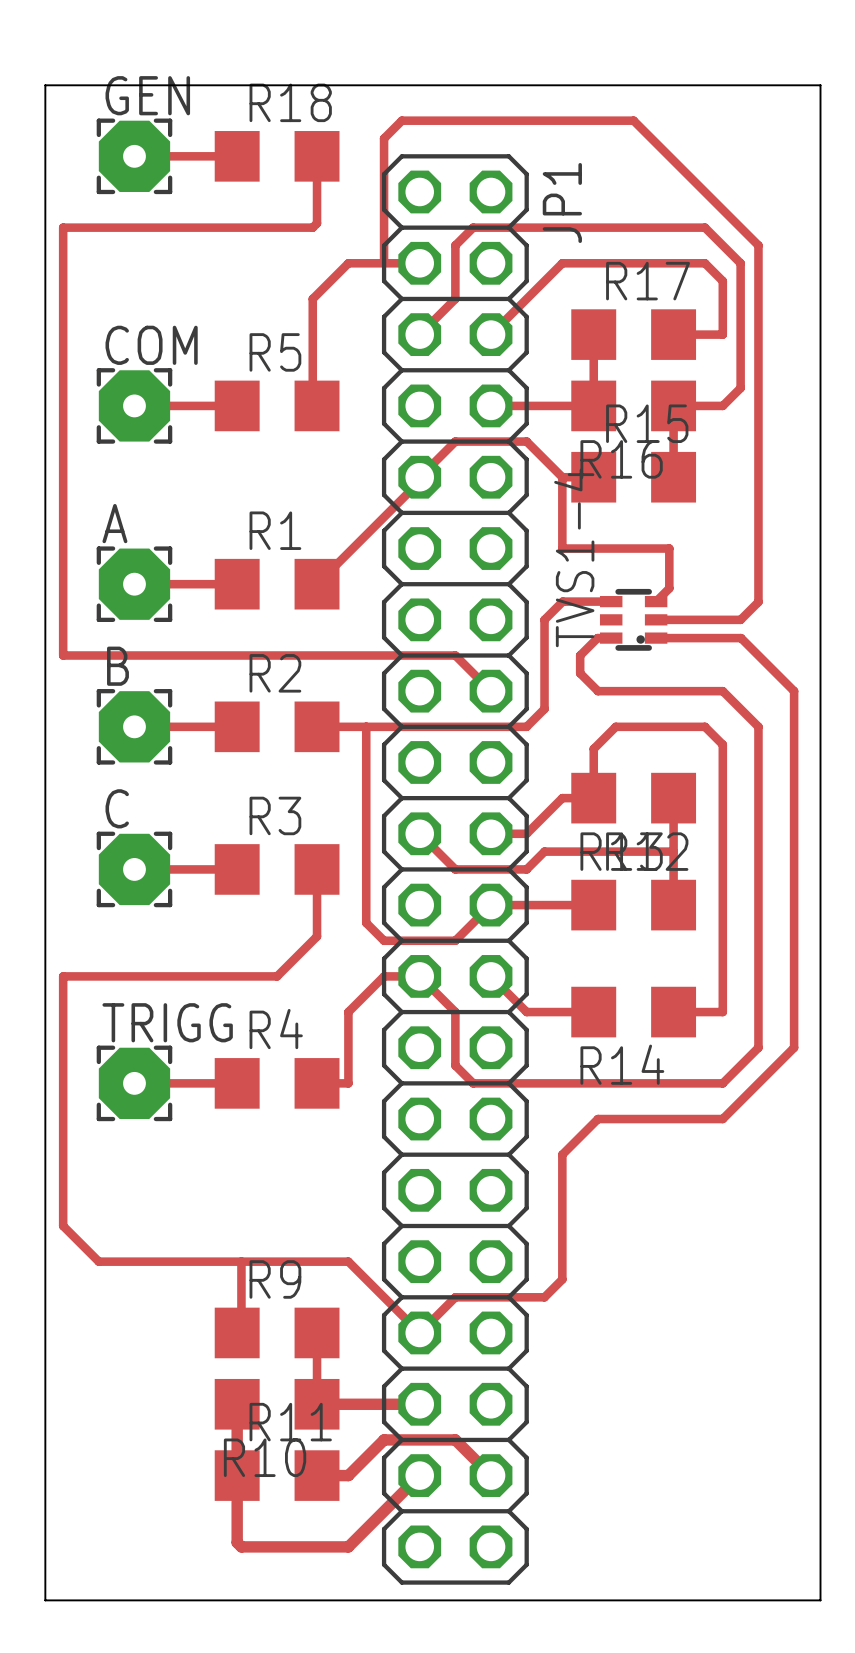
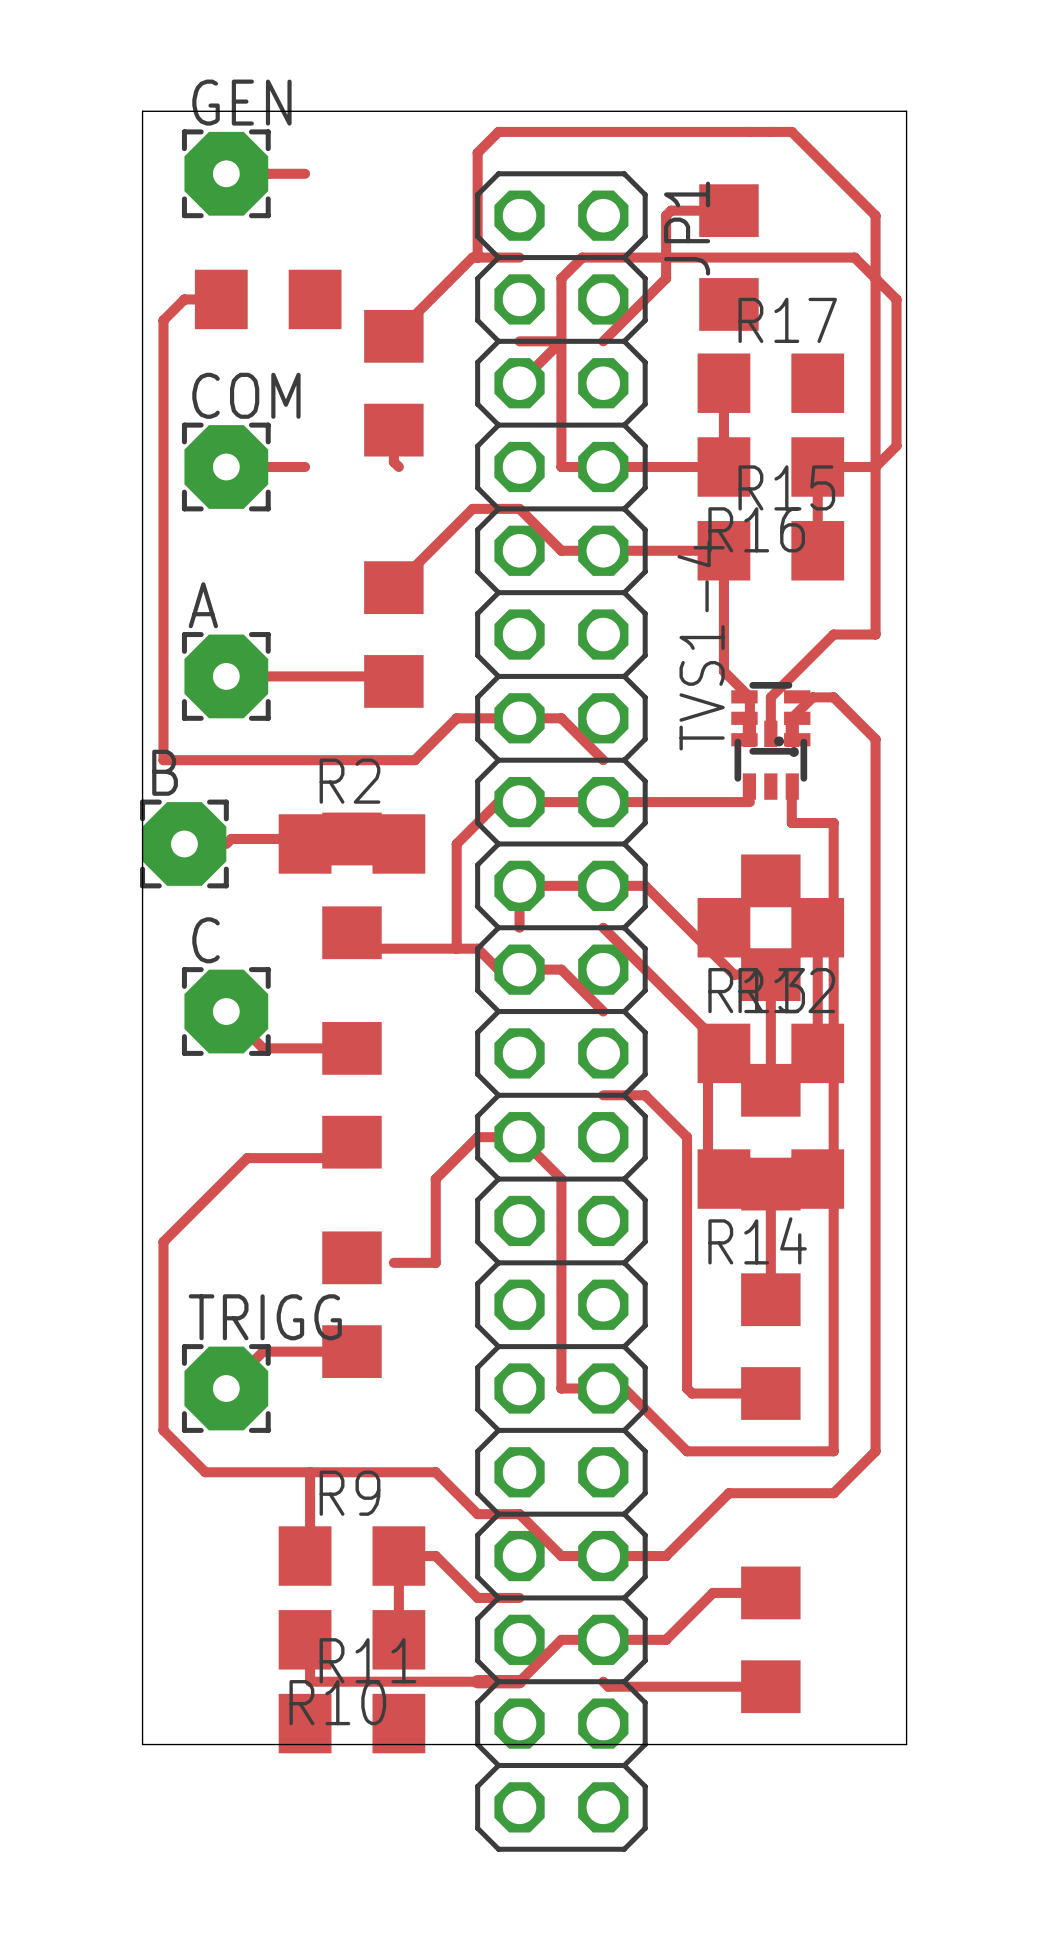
board edge: (45, 85) (820, 85) (820, 1600) (45, 1600) (45, 85) -> (142, 111) (142, 1744) (906, 1744) (906, 111) (142, 111)
top track: (633, 120) (758, 245) (758, 602) (740, 619) (656, 619) -> none
GEN position: (134, 156) -> (226, 173)
R18: (277, 156) -> none
top track: (317, 156) (317, 223) (312, 227) (63, 227) (63, 655) (116, 655) -> (221, 299) (184, 299) (163, 320) (163, 760)
top track: none -> (728, 210) (671, 210) (666, 215) (666, 278) (603, 341)
top track: (384, 227) (384, 263) -> none
top track: none -> (519, 257) (472, 257) (393, 336)
part: none -> (728, 257)
part: none -> (268, 299)
top track: (419, 263) (348, 263) (312, 298) (312, 374) -> none
top track: (722, 281) (704, 263) (562, 263) (491, 334) -> (875, 320) (875, 215) (791, 131) (770, 131)
top track: none -> (519, 341) (561, 341) (561, 466) (603, 466)
part: none -> (393, 383)
top track: (673, 334) (722, 334) -> (770, 733) (770, 697) (833, 634) (875, 634) (875, 383)
COM position: (134, 405) -> (226, 466)
R5: (277, 405) -> none
top track: none -> (687, 550) (561, 550) (519, 508) (472, 508) (393, 587)
top track: none -> (723, 550) (723, 671) (749, 697) (749, 733)
part: none -> (393, 634)
A position: (134, 584) -> (226, 676)
top track: none -> (305, 676) (388, 676) (393, 681)
R1: (277, 584) -> none
top track: (317, 584) (419, 481) (419, 477) (455, 441) (526, 441) (562, 477) (562, 548) (669, 548) (669, 588) (656, 601) -> none
top track: (611, 601) (562, 601) (544, 619) (544, 708) (526, 726) (317, 726) -> none
top track: (656, 637) (741, 638) (794, 691) (794, 1047) (722, 1119) (598, 1119) (562, 1154) -> (603, 1095) (645, 1095) (687, 1137) (687, 1346)
top track: (611, 638) (597, 638) (580, 655) (580, 673) (598, 691) -> (456, 843) (498, 802) (728, 802)
top track: (330, 655) (455, 655) (491, 691) -> (414, 760) (456, 718) (561, 718) (603, 760)
part: none -> (770, 760)
top track: (615, 691) (722, 691) (758, 726) (758, 1047) (722, 1083) (473, 1083) (455, 1065) -> (792, 786) (791, 823) (833, 823) (833, 1451) (687, 1451) (624, 1388) (561, 1388) (561, 1241)
top track: none -> (351, 838) (231, 838) (226, 843)
top track: (134, 726) (237, 726) -> none
top track: (722, 744) (704, 726) (615, 726) (593, 748) (593, 798) (562, 798) (526, 833) (491, 833) -> (875, 864) (875, 739) (833, 697) (812, 697) (792, 717) (792, 733)
part: none -> (351, 885)
top track: none -> (519, 927) (519, 906) (540, 885) (645, 885) (733, 974) (770, 974) (770, 1090)
top track: none -> (603, 927) (708, 1032) (708, 1158) (728, 1179) (765, 1179) (770, 1184) (770, 1299)
part: none -> (770, 927)
top track: none -> (351, 932) (367, 948) (477, 948) (498, 969) (561, 969) (603, 1011)
top track: (366, 815) (366, 922) (384, 940) (455, 940) (491, 905) (593, 905) -> none
top track: (419, 833) (455, 869) (526, 869) (544, 851) (673, 851) -> none
top track: (134, 869) (237, 869) -> none
C position: (134, 869) -> (226, 1011)
top track: none -> (226, 1011) (263, 1048) (351, 1048)
R3: (277, 869) -> none
top track: (317, 869) (317, 936) (277, 976) (63, 976) (63, 1226) (98, 1261) (152, 1261) -> (351, 1142) (336, 1158) (247, 1158) (163, 1241) (163, 1430) (205, 1472)
part: none -> (351, 1095)
top track: (491, 976) (526, 1012) (593, 1012) -> none
part: none -> (770, 1137)
top track: (673, 1012) (722, 1012) -> none
top track: (134, 1083) (237, 1083) -> none
TRIGG position: (134, 1083) -> (226, 1388)
R4: (277, 1083) -> none
part: none -> (351, 1304)
part: none -> (770, 1346)
top track: none -> (351, 1351) (263, 1351) (226, 1388)
top track: (562, 1190) (562, 1279) (544, 1297) (455, 1297) (419, 1332) (384, 1297) -> (875, 1179) (875, 1451) (833, 1493) (728, 1493) (666, 1556) (561, 1556) (519, 1514) (477, 1514)
top track: none -> (687, 1388) (692, 1393) (770, 1393)
top track: none -> (398, 1556) (435, 1556) (477, 1597) (519, 1597)
top track: (237, 1404) (237, 1542) (241, 1546) (348, 1546) (419, 1475) -> (305, 1639) (310, 1644) (310, 1681) (477, 1681)
top track: (317, 1404) (419, 1404) -> none
part: none -> (770, 1639)
top track: (384, 1439) (348, 1475) (317, 1475) -> none
top track: (419, 1439) (455, 1439) (491, 1475) -> (519, 1681) (561, 1639) (666, 1639) (713, 1592) (770, 1592)
top track: none -> (603, 1681) (608, 1686) (770, 1686)

